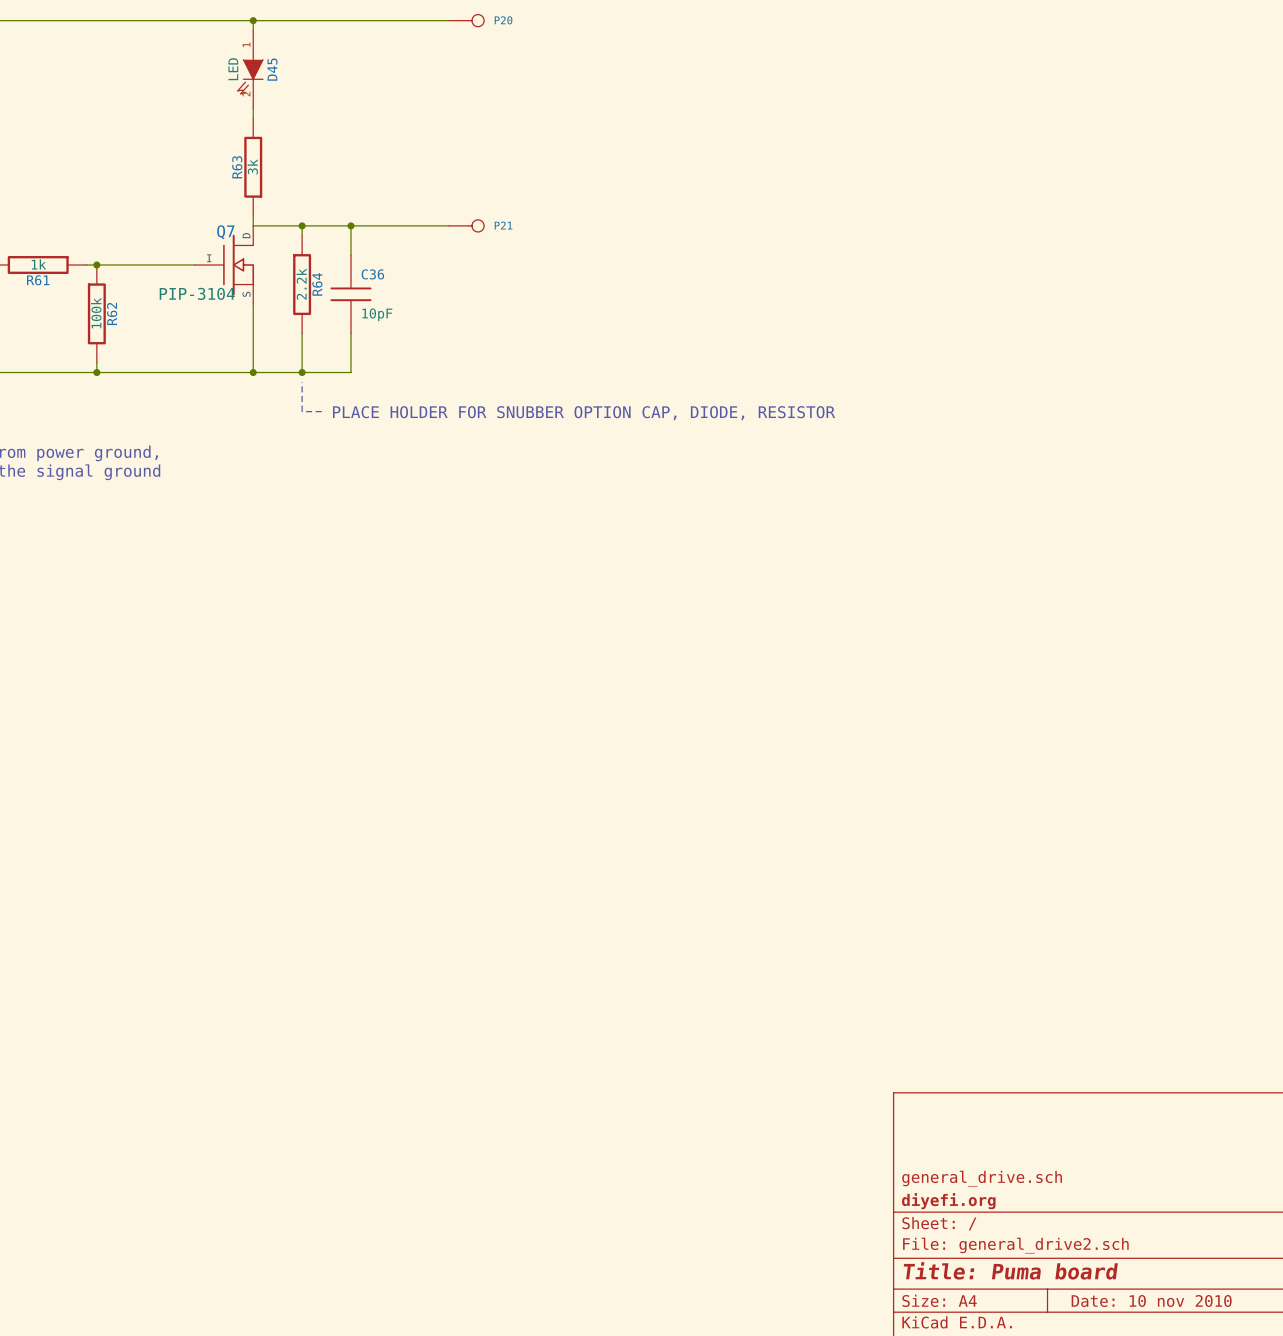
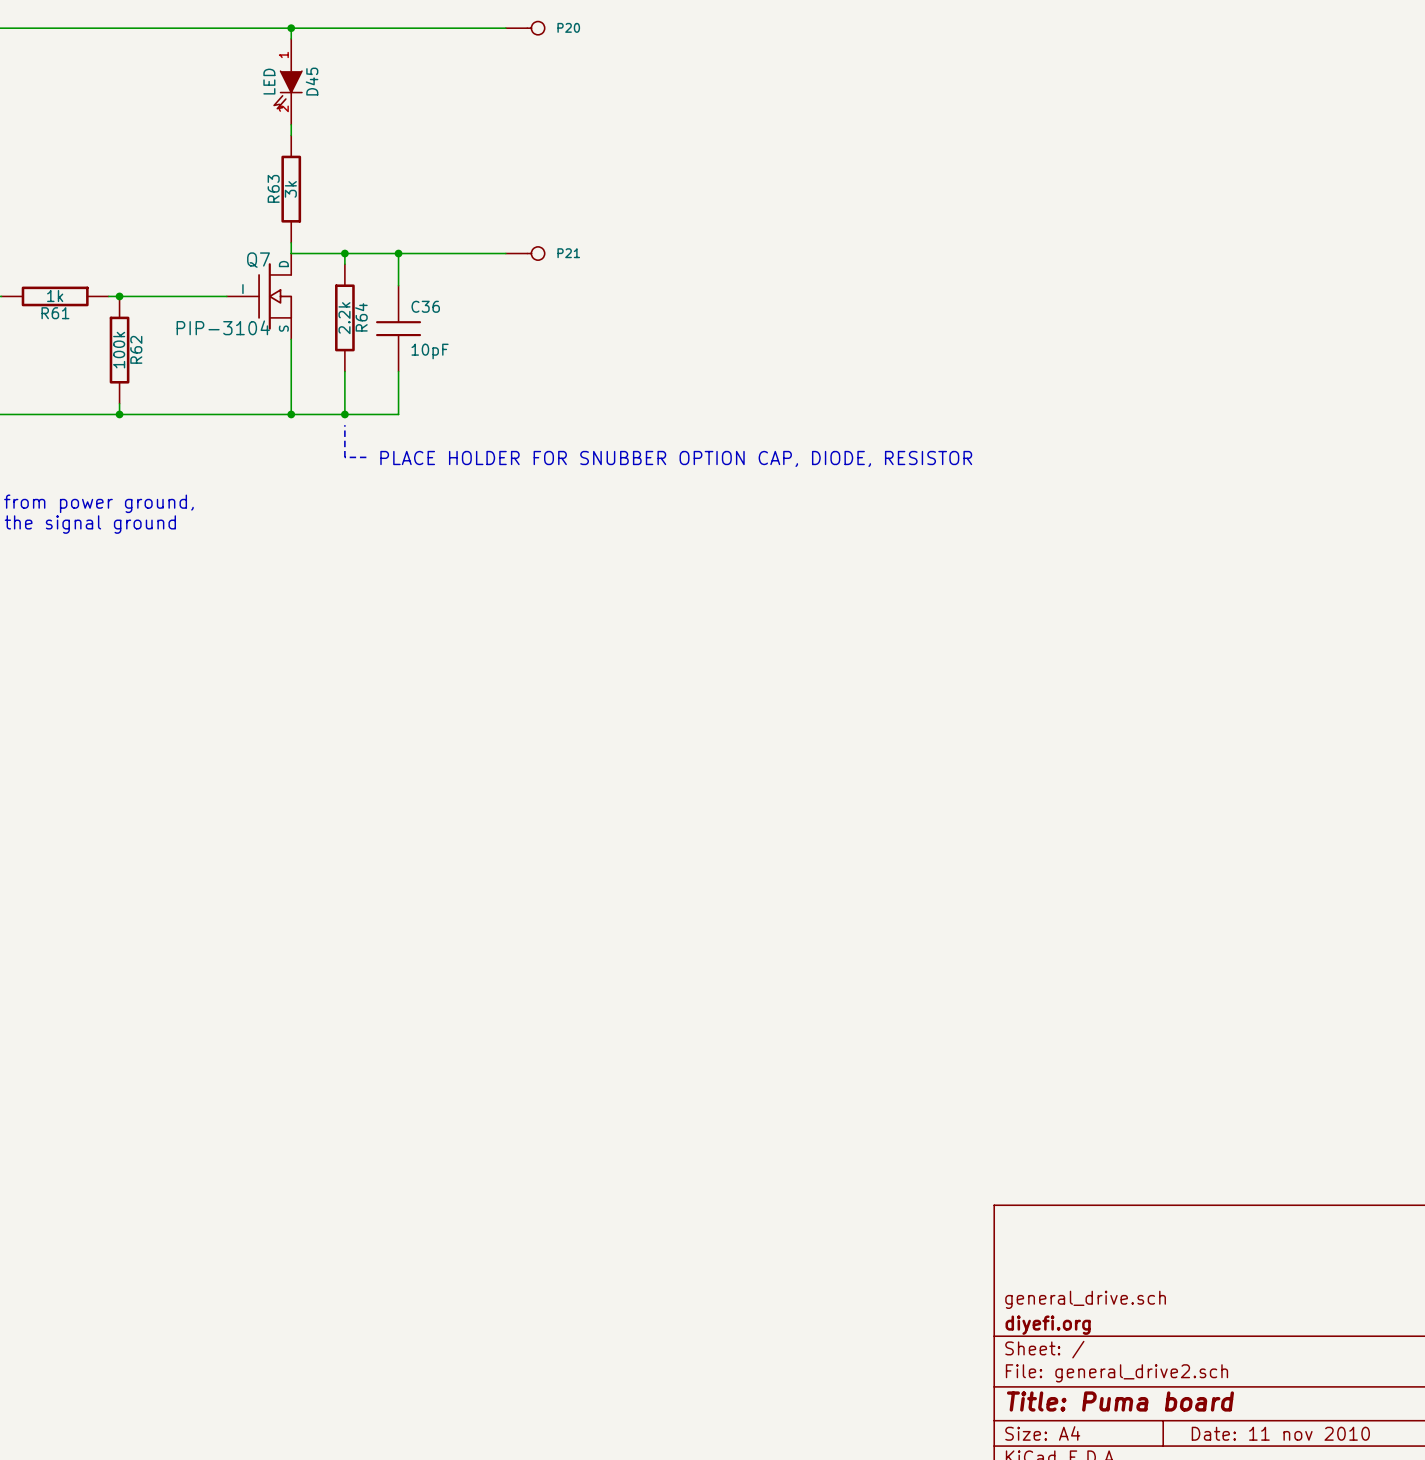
title block: Date: 10 nov 2010 (1151, 1300) -> Date: 11 nov 2010 (1280, 1433)

